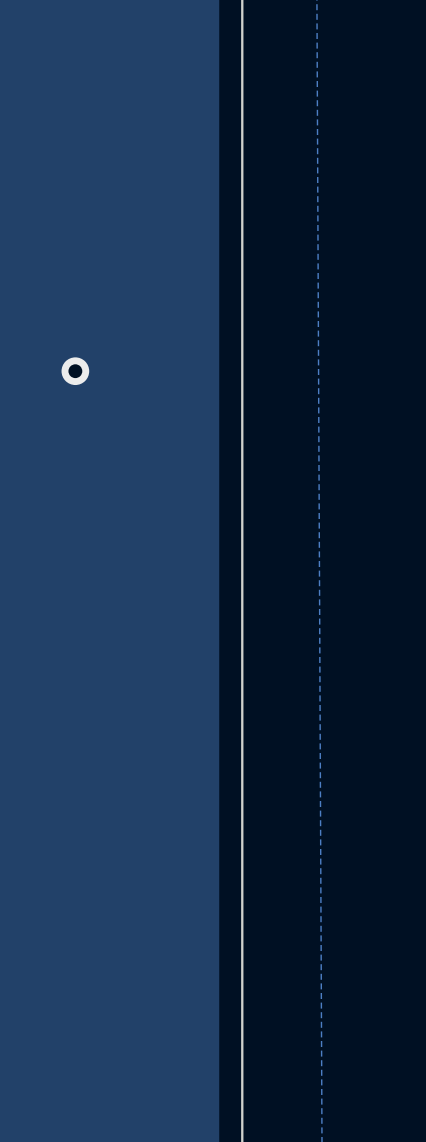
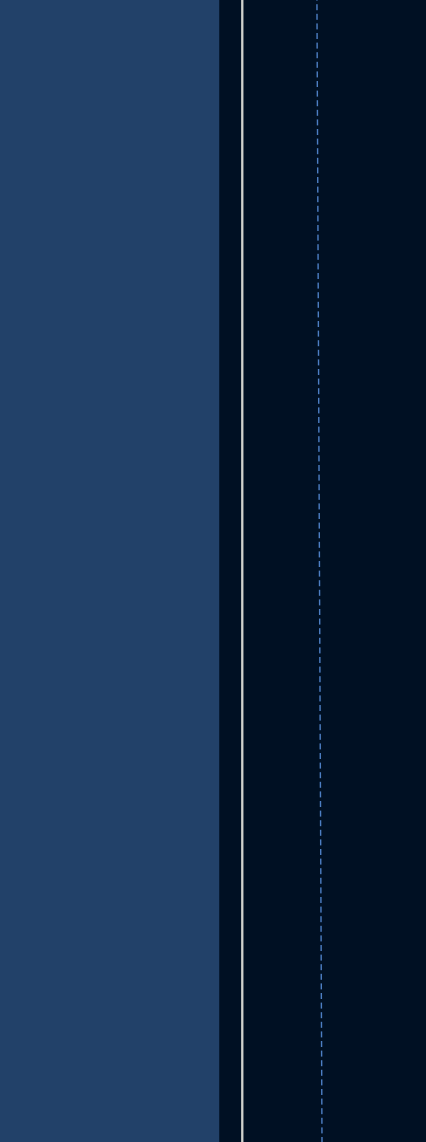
via: (75, 371) -> none

